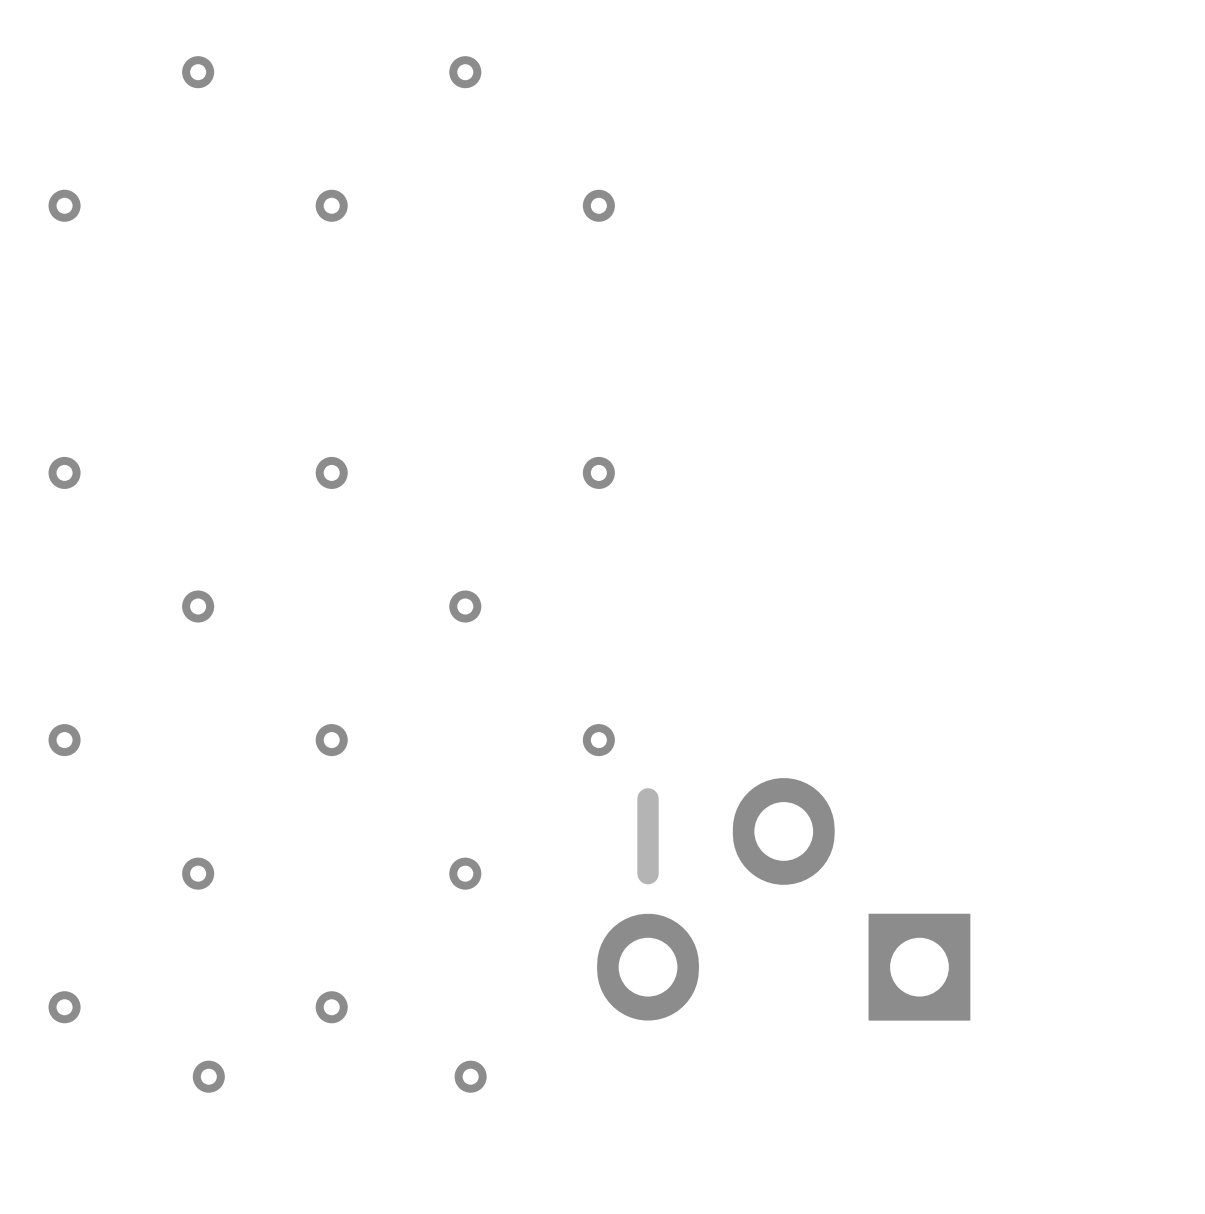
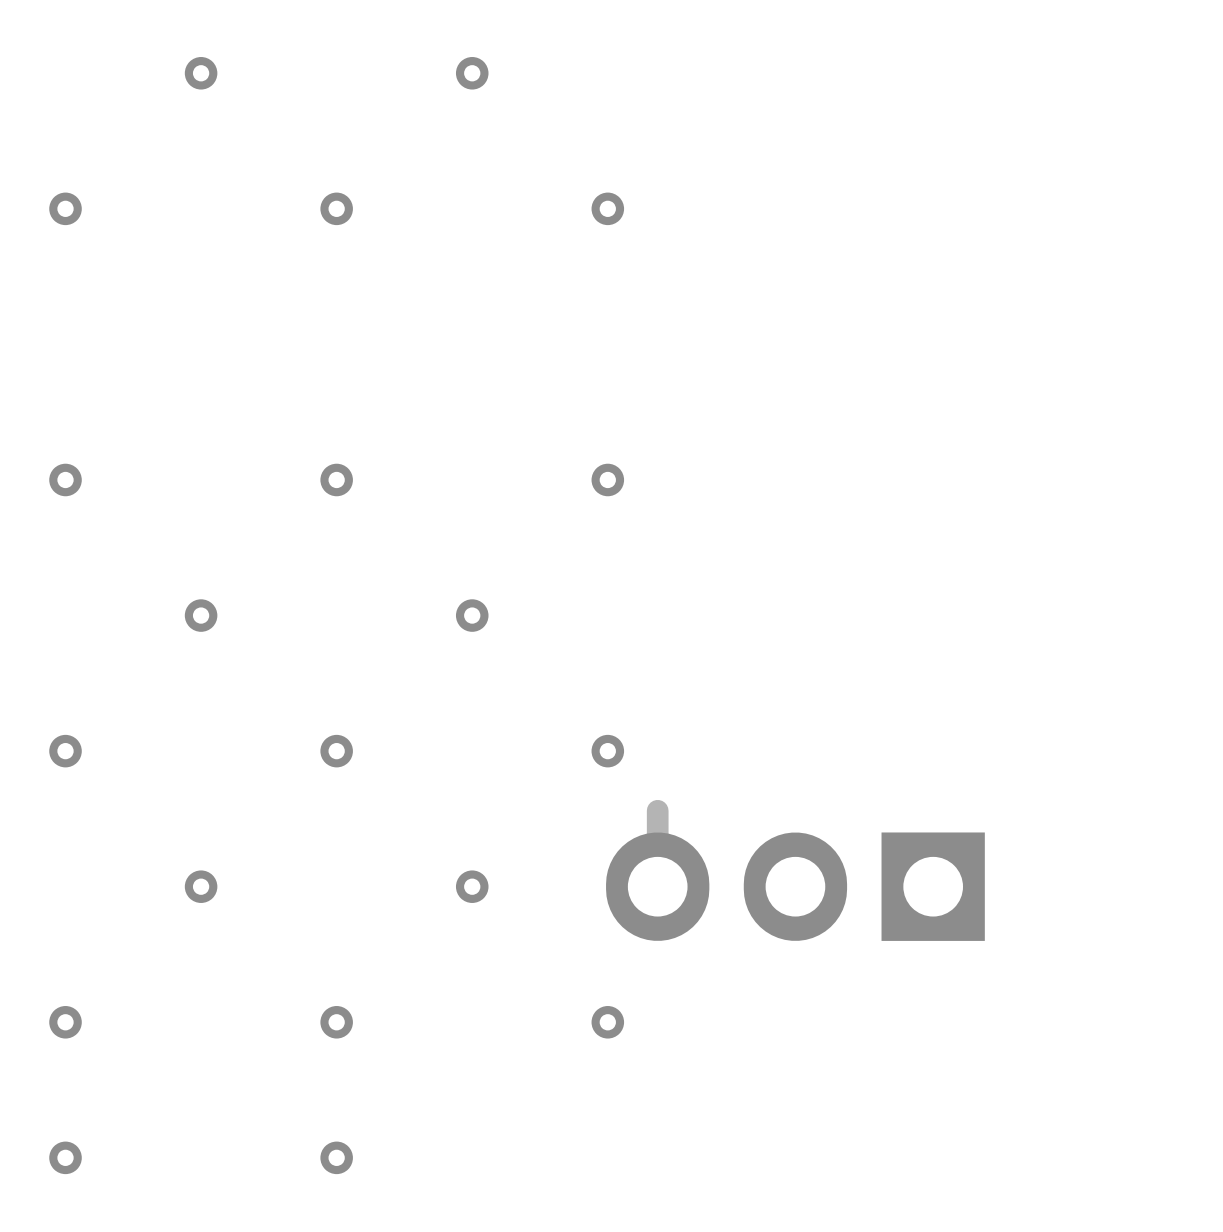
part footprint: [597, 778, 971, 1021] -> [606, 832, 985, 941]
via: none -> (607, 1022)
via: (208, 1076) -> none
via: (470, 1076) -> none
via: none -> (65, 1157)
via: none -> (336, 1157)

